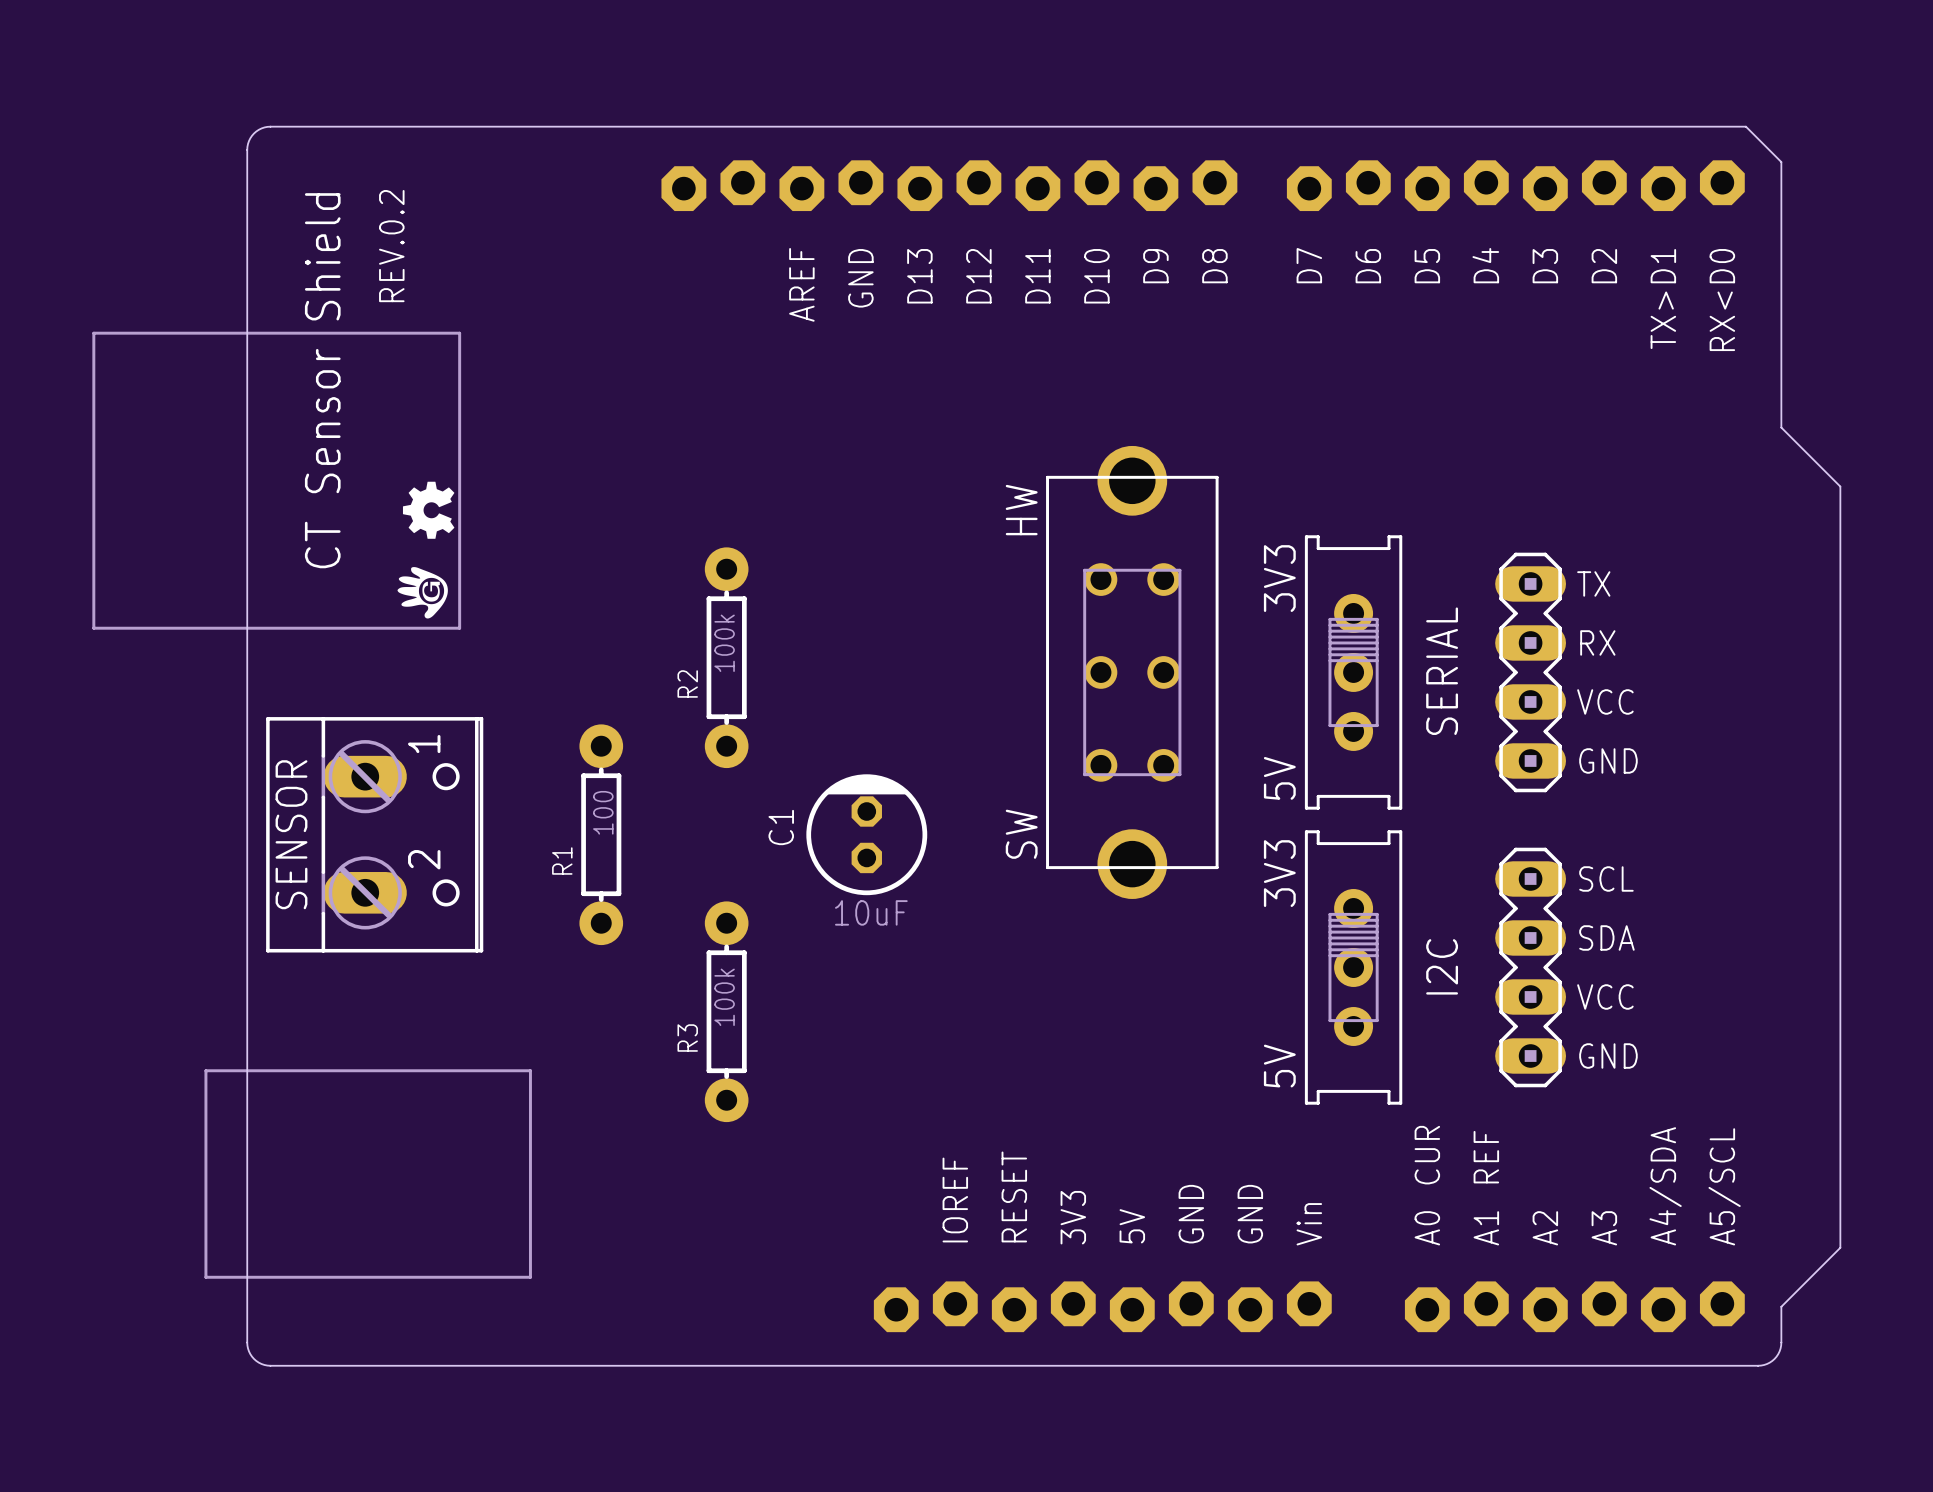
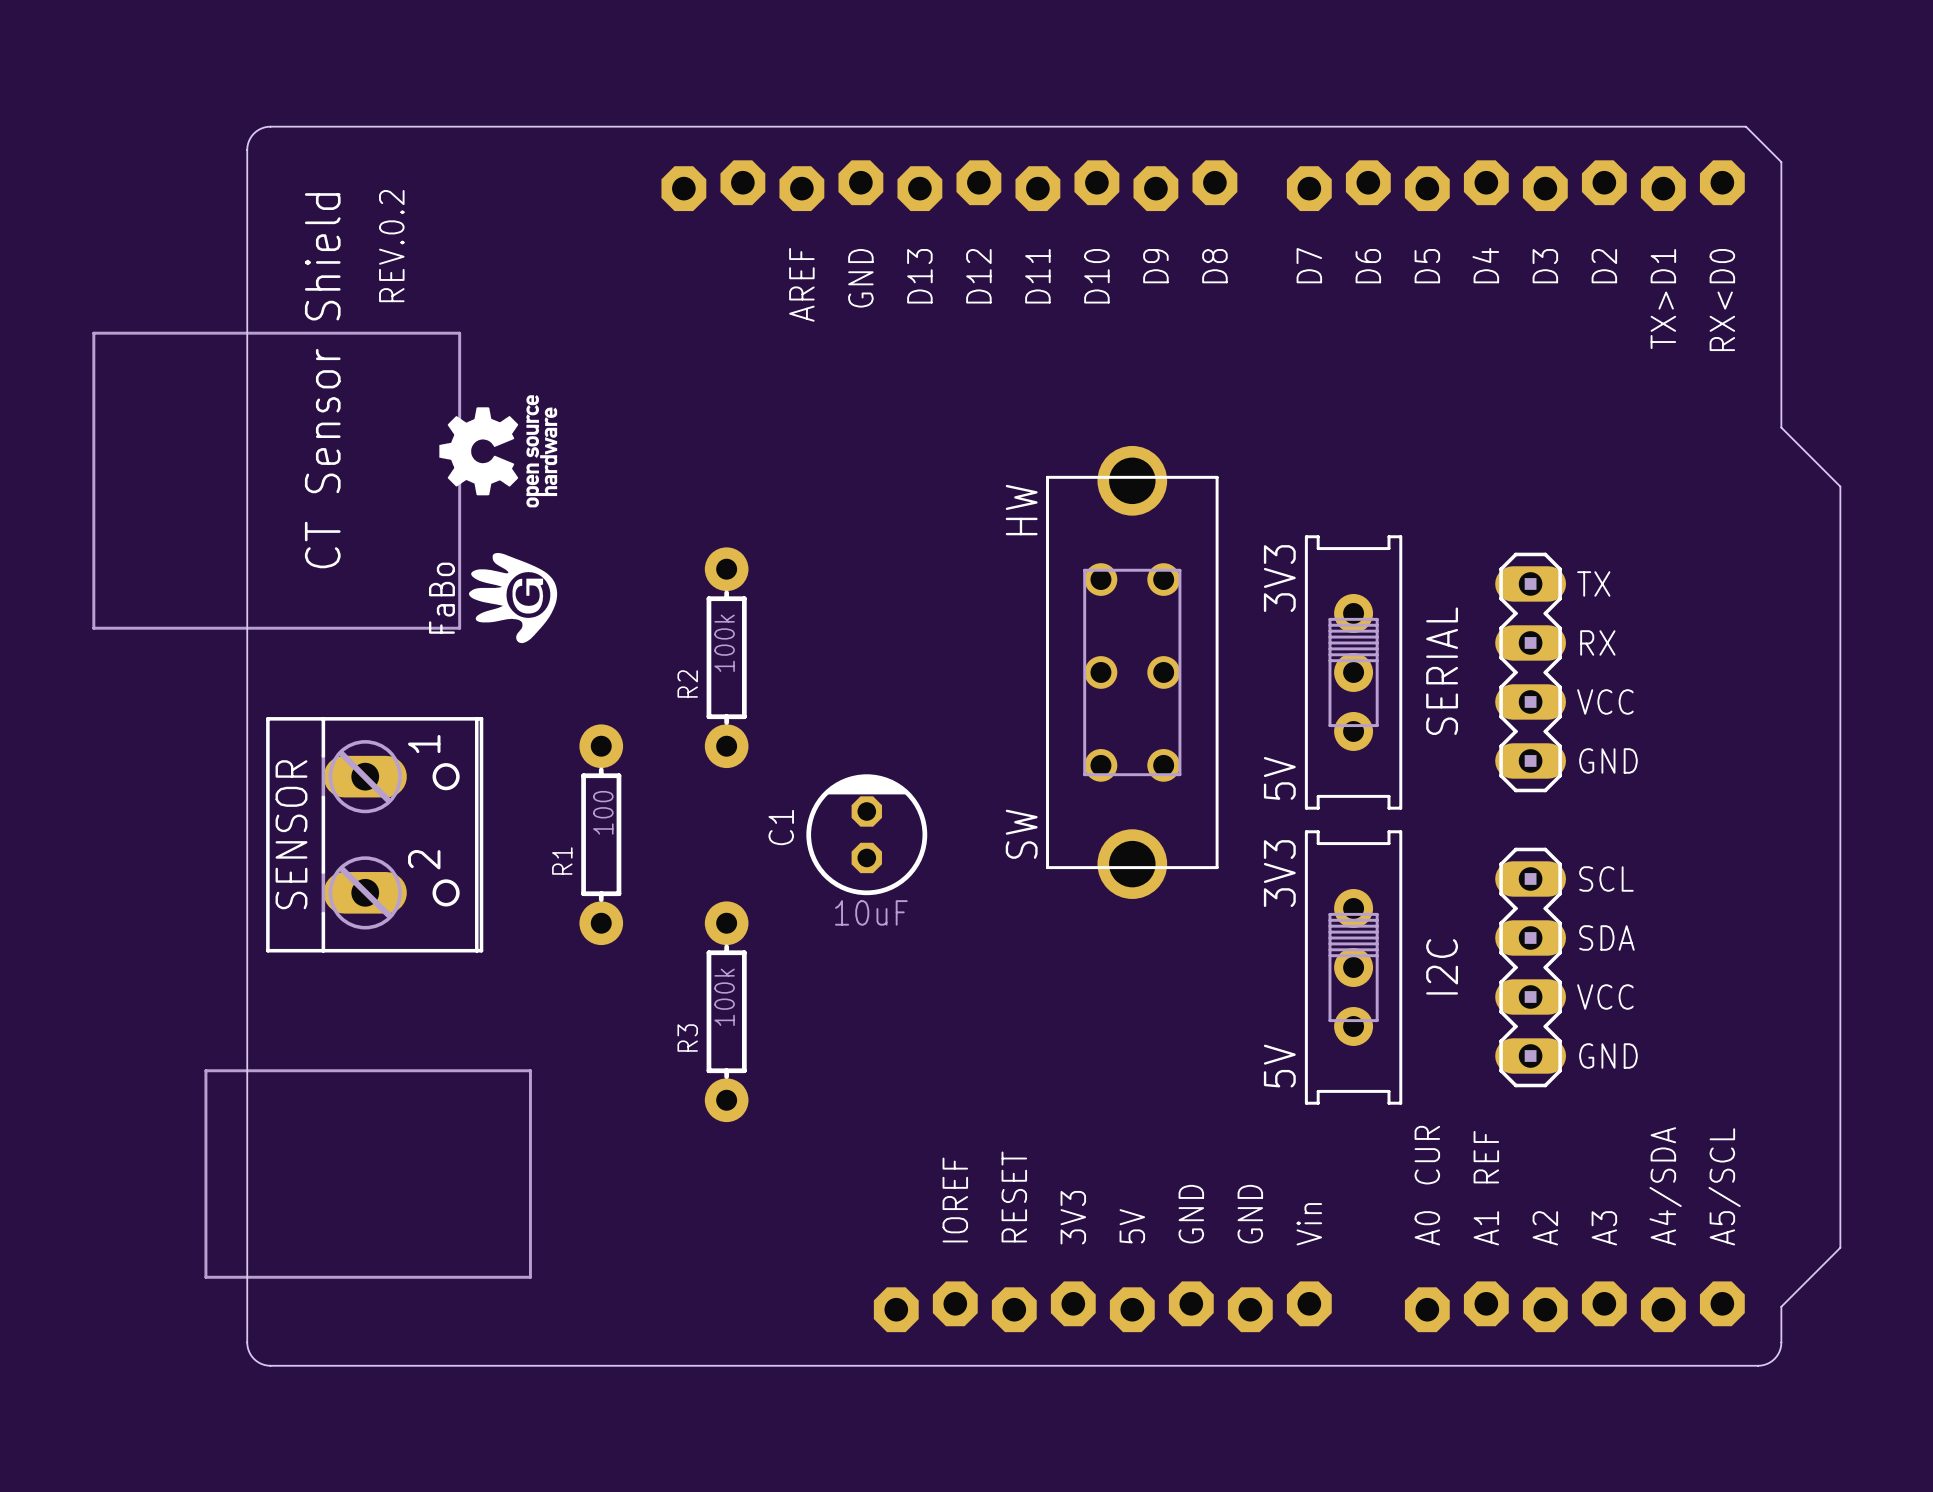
drawing: none -> [439, 395, 558, 508]
drawing: [402, 481, 455, 539] -> none
drawing: none -> [468, 553, 558, 644]
drawing: [397, 567, 448, 619] -> none
text: none -> FaBo (441, 598)

